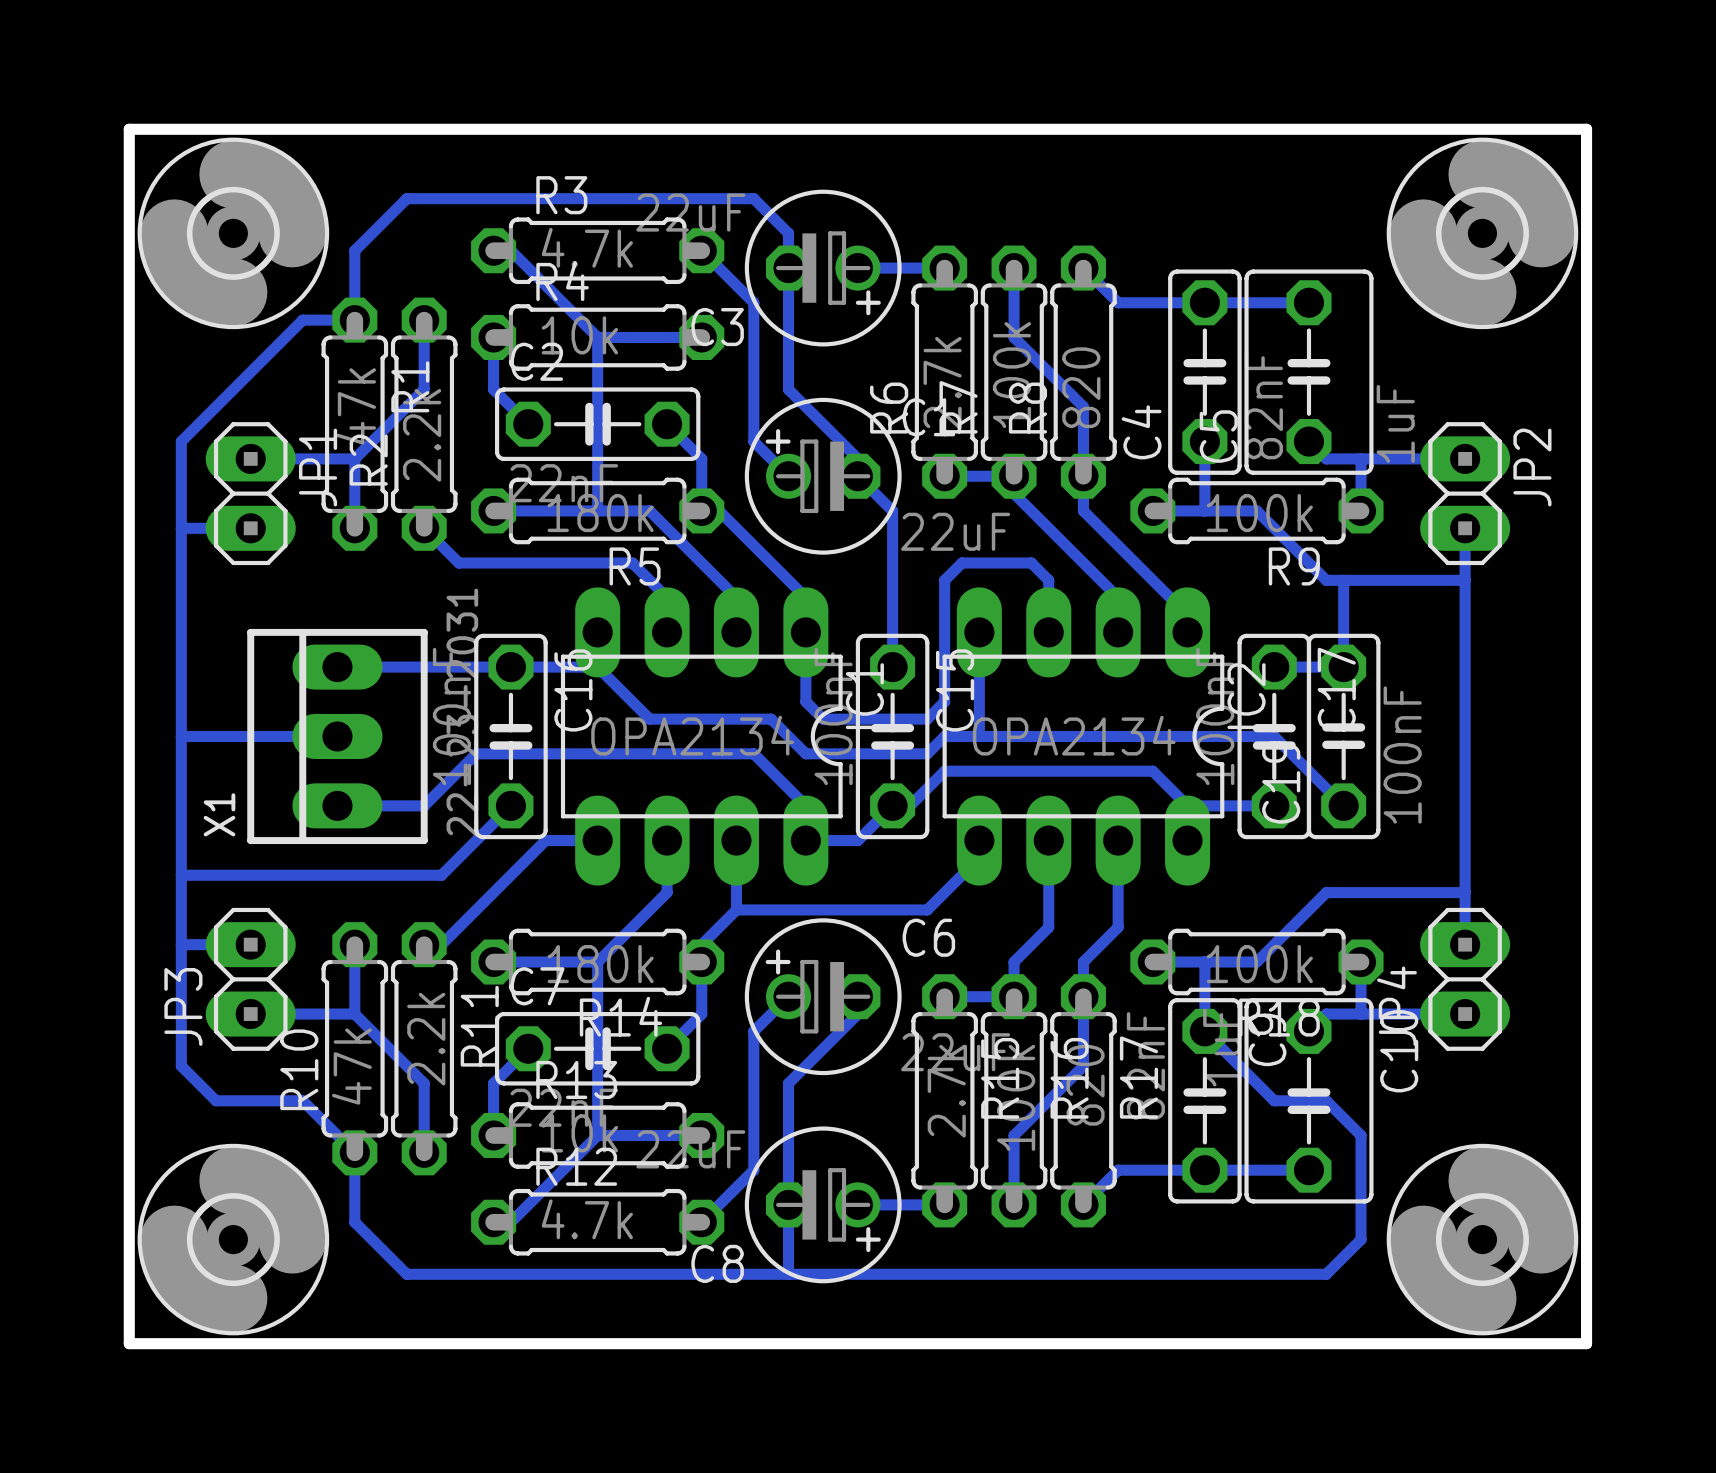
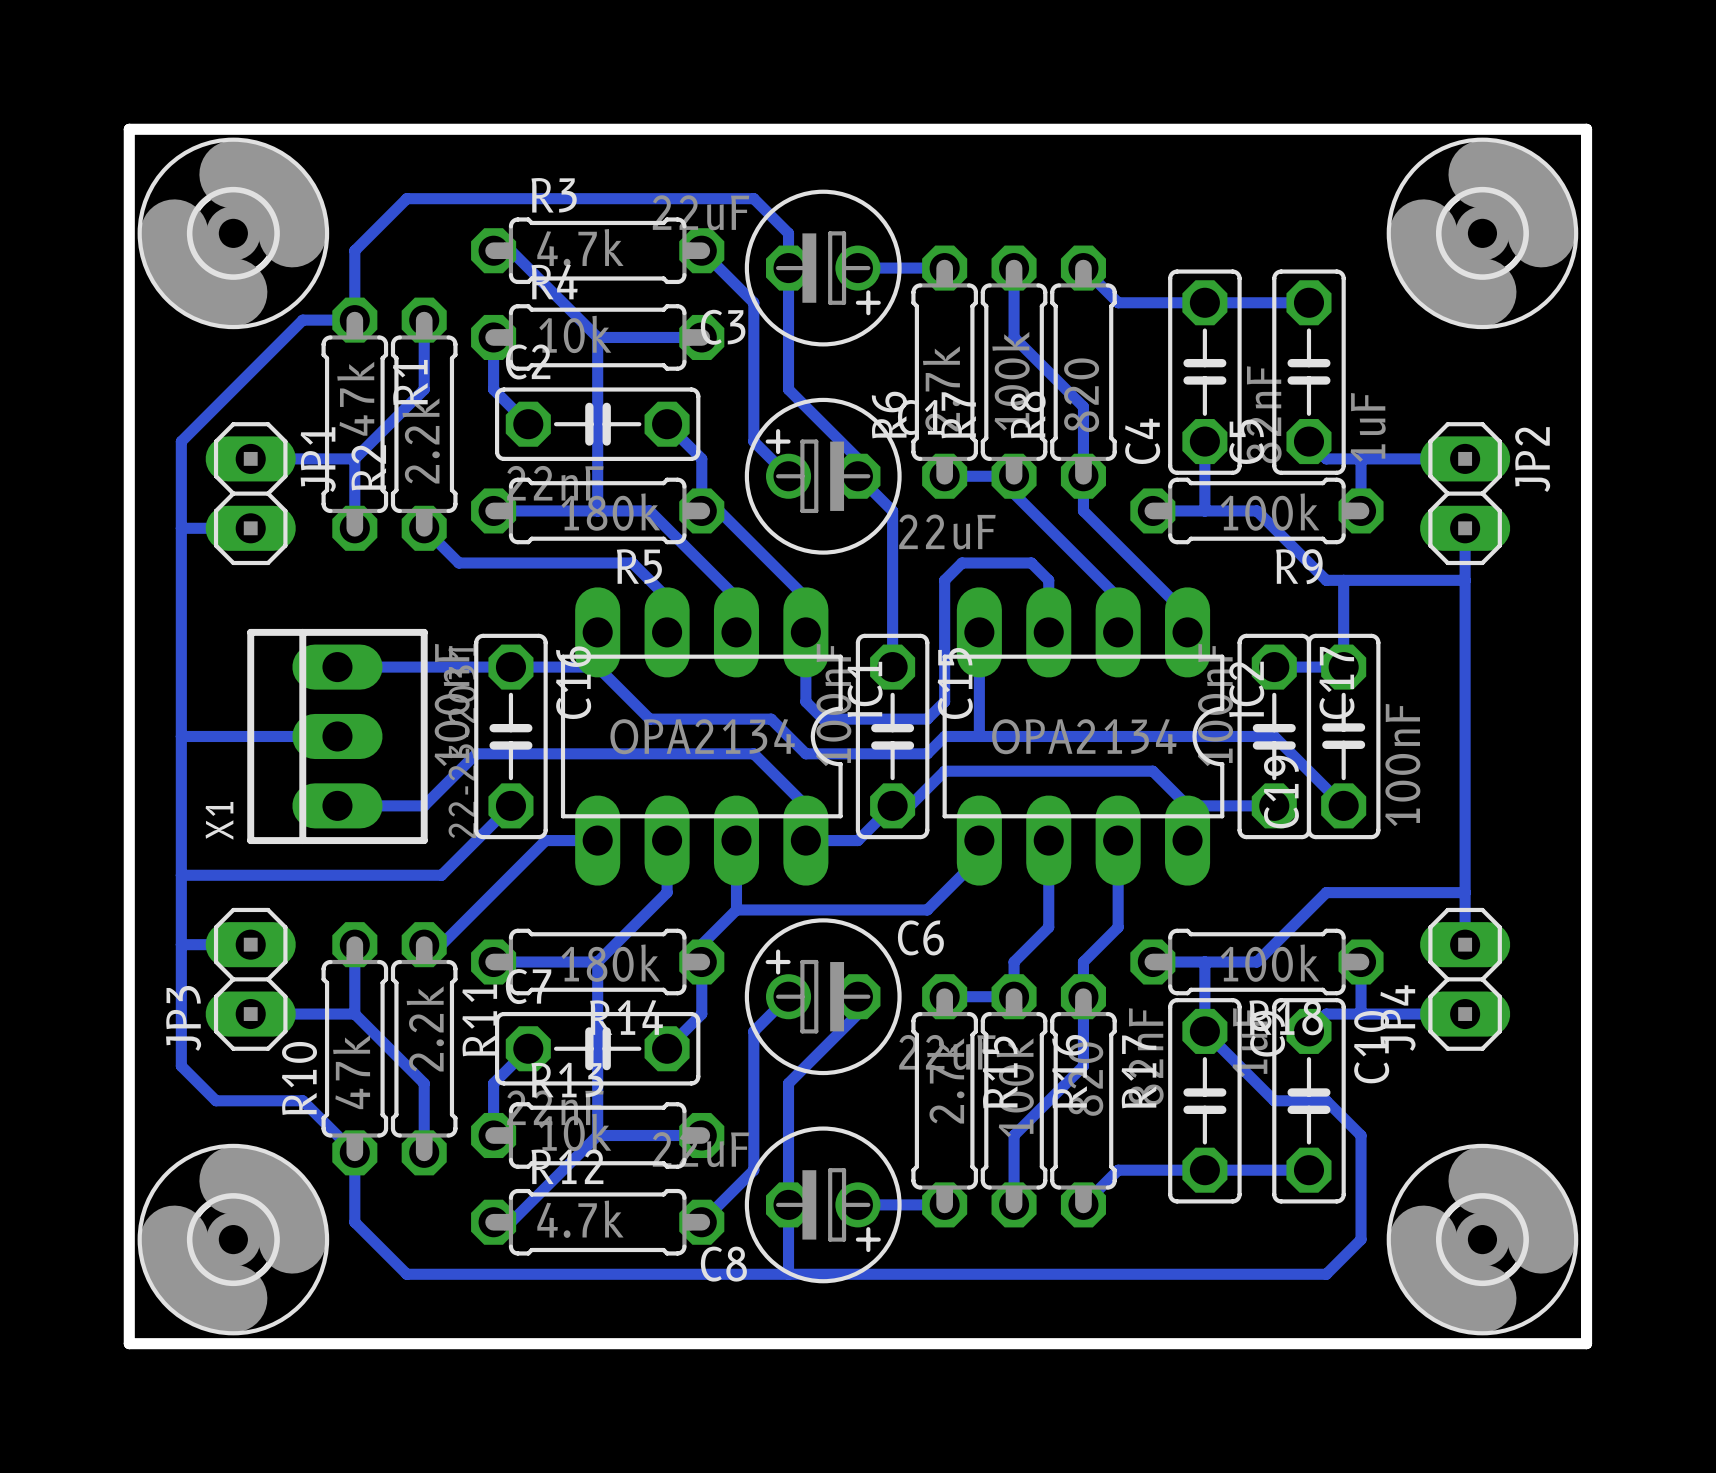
C5 footprint: [1244, 269, 1374, 475] -> [1272, 269, 1346, 475]
C10 footprint: [1244, 998, 1374, 1204] -> [1272, 998, 1346, 1204]

